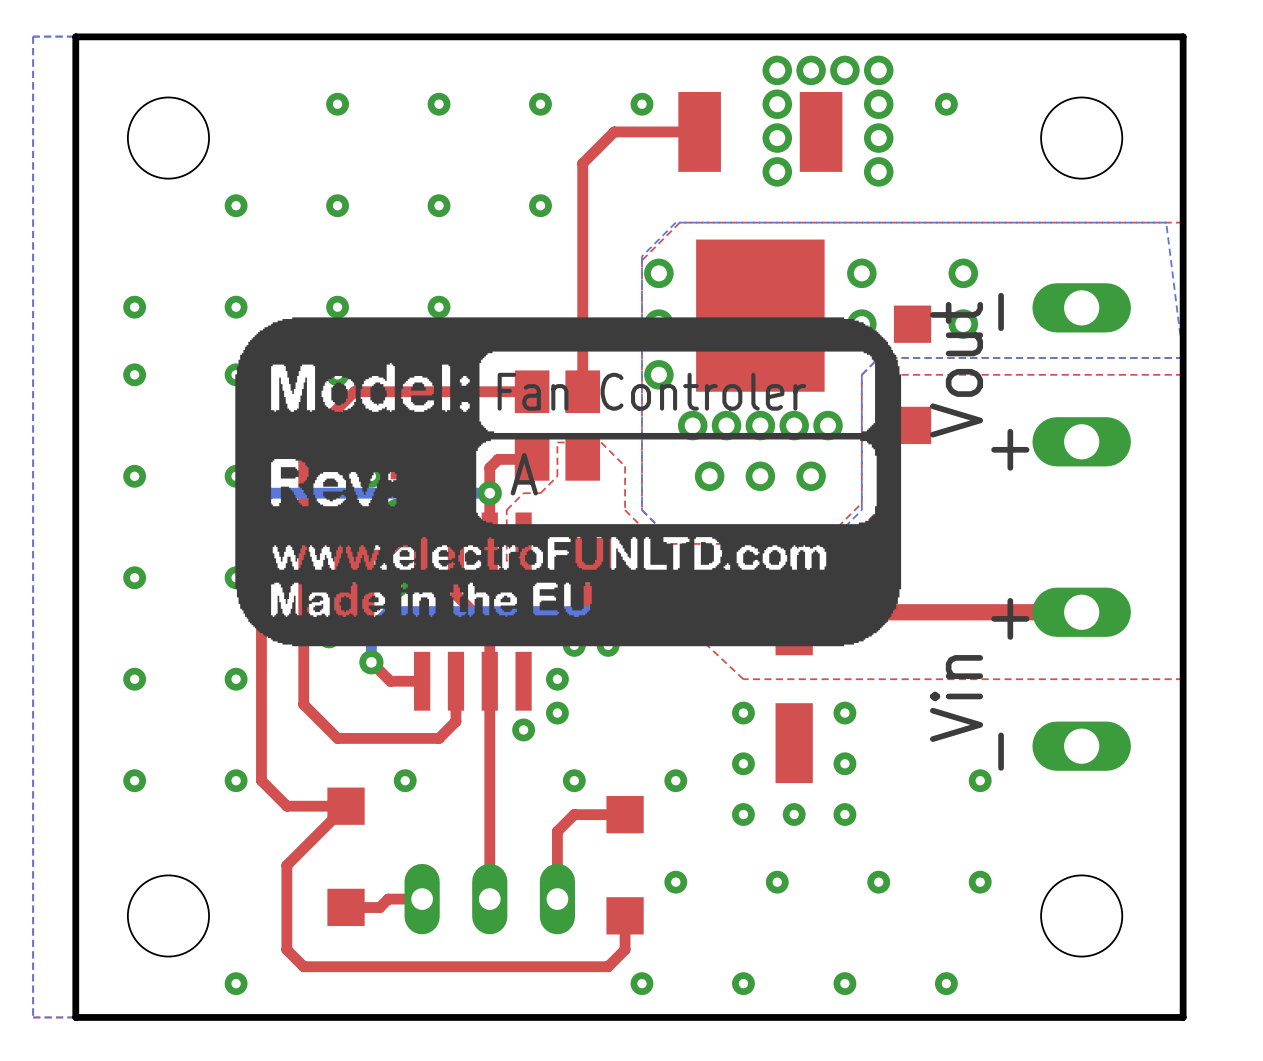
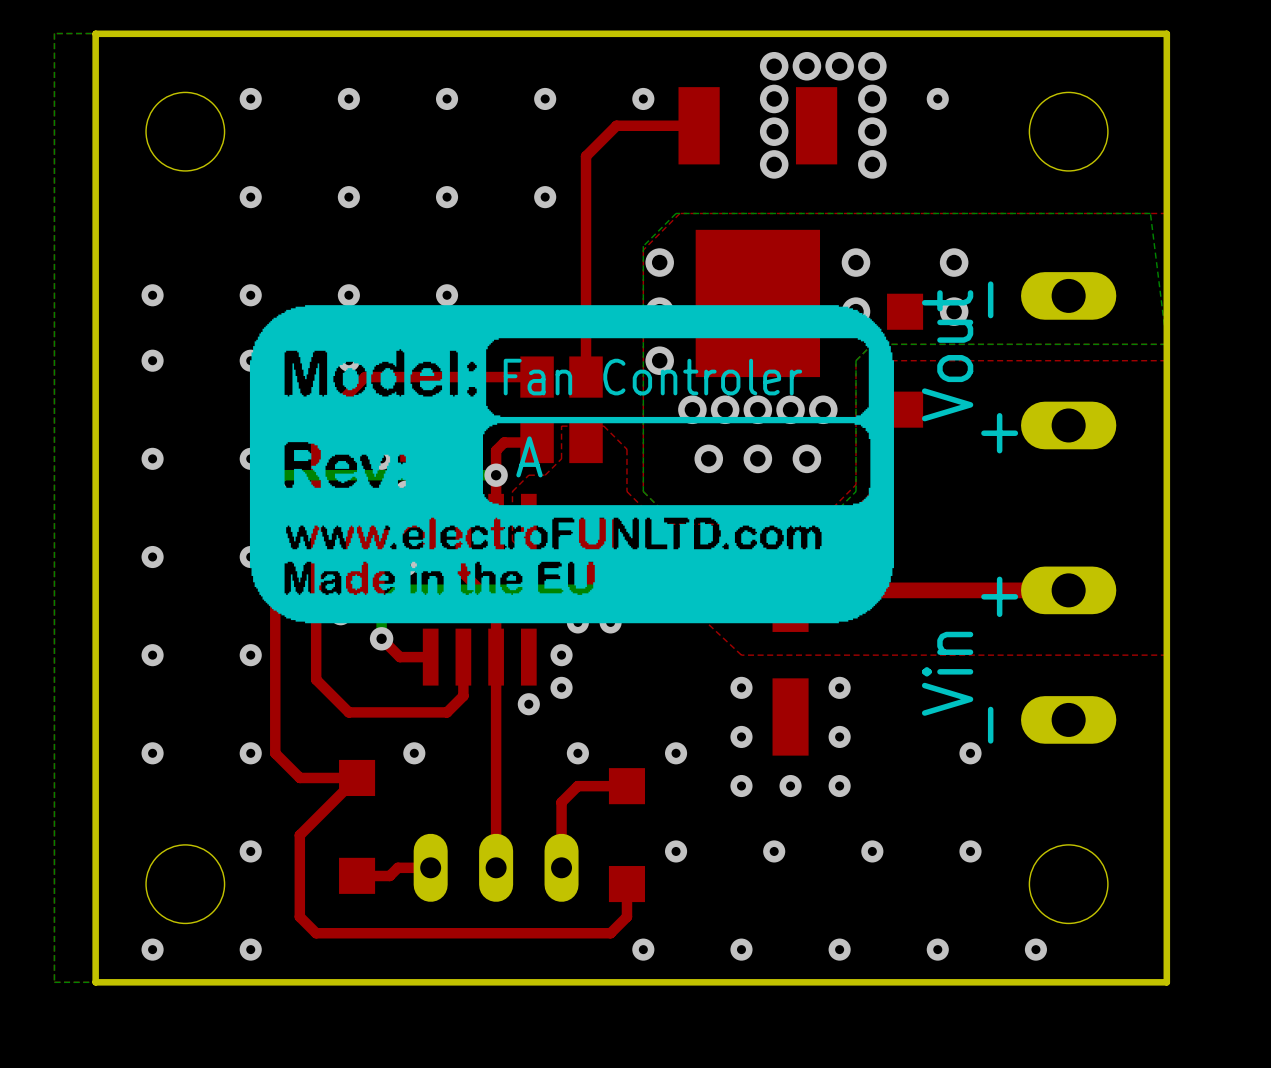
via: none -> (250, 98)
via: none -> (250, 851)
via: none -> (152, 949)
via: none -> (1035, 949)

